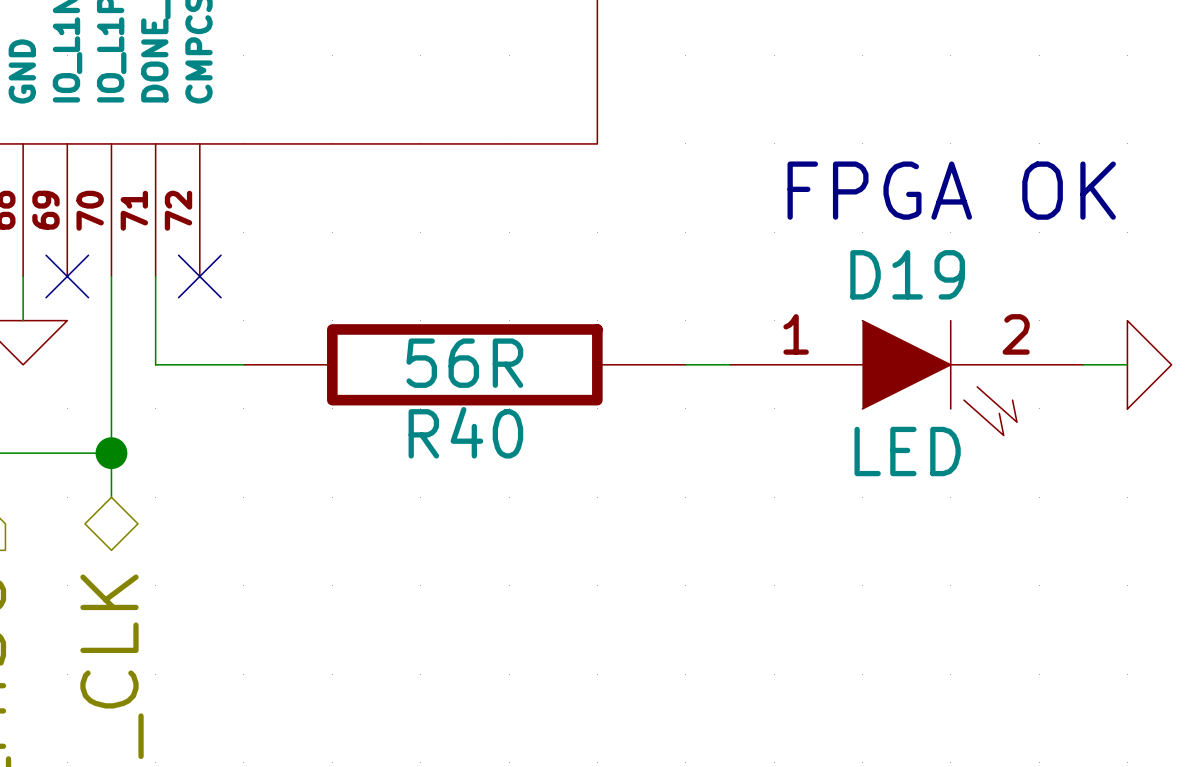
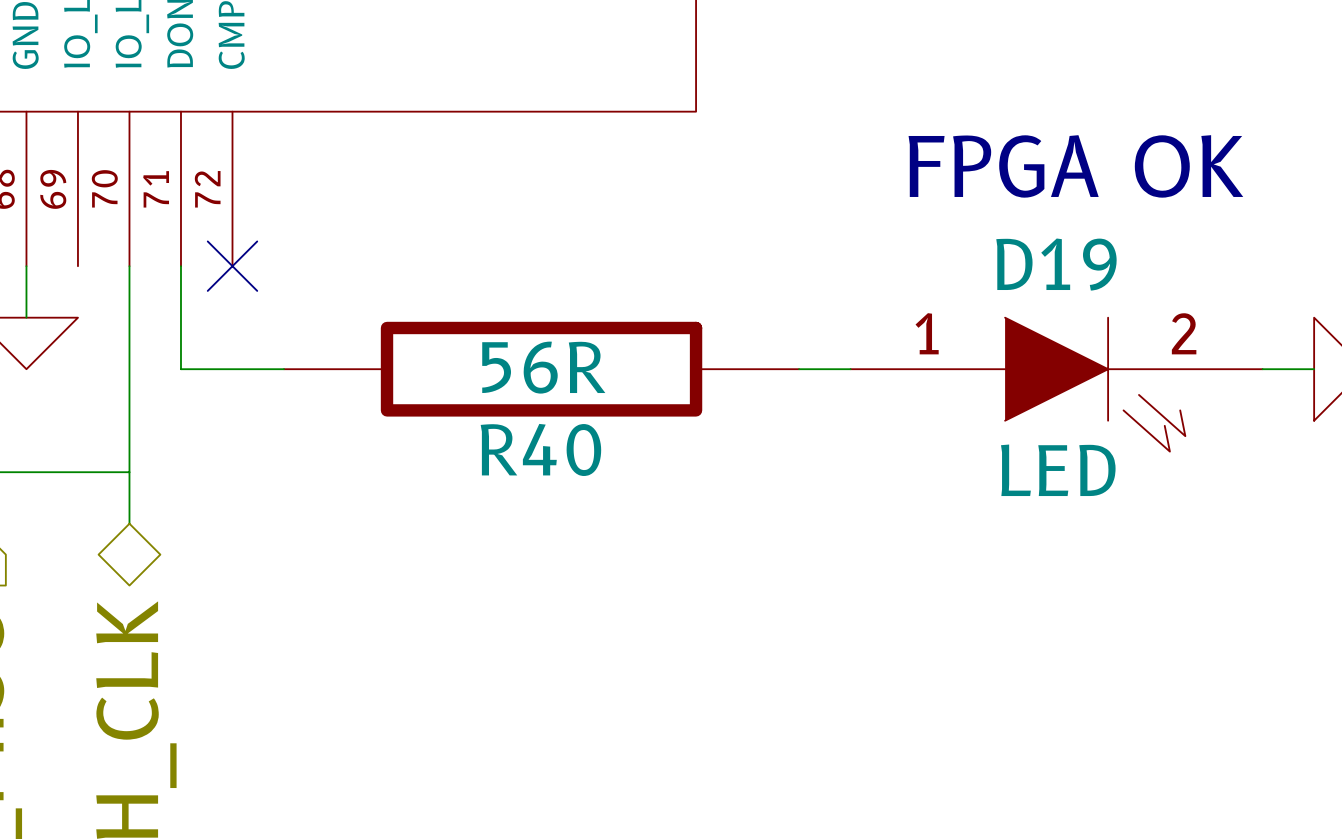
no-connect mark: (67, 276) -> none
junction: (111, 453) -> none

